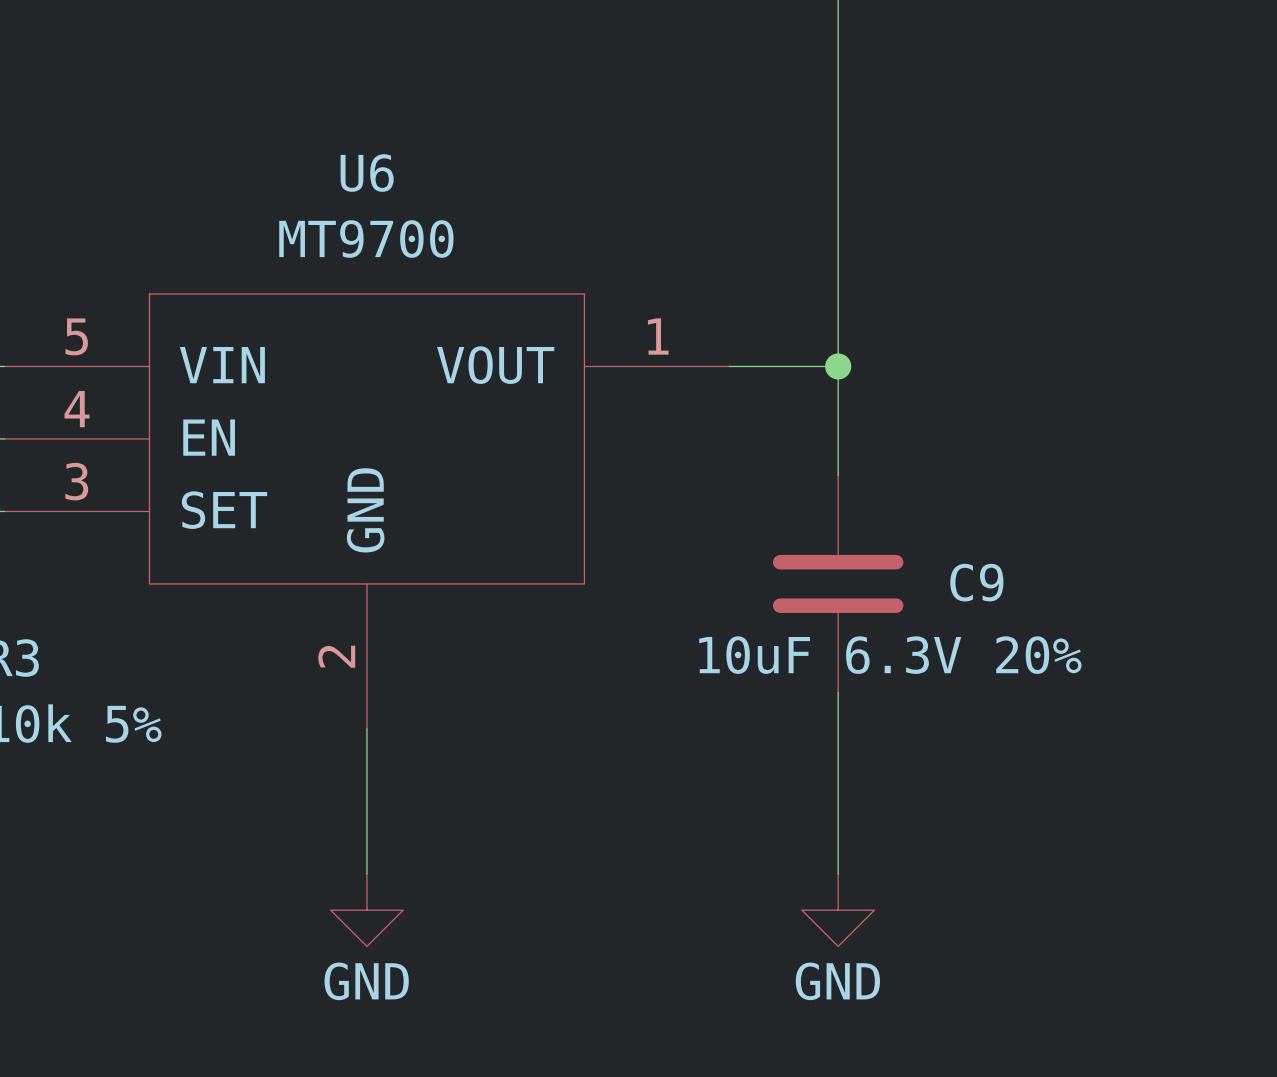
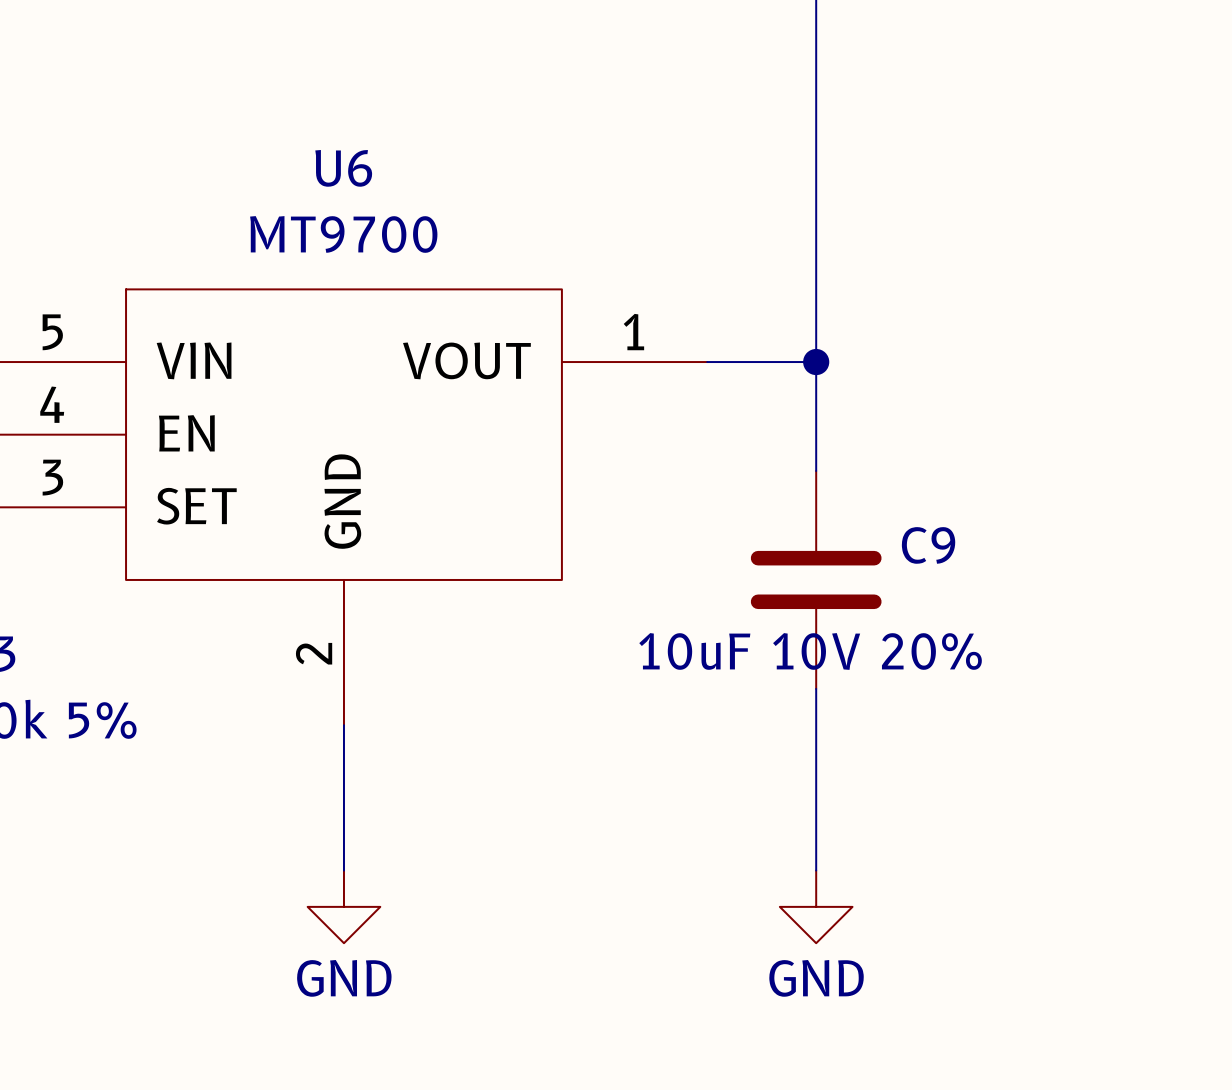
C9 name position: C9 (976, 582) -> C9 (928, 545)
C9 value: 10uF 6.3V 20% (890, 655) -> 10uF 10V 20% (810, 651)

